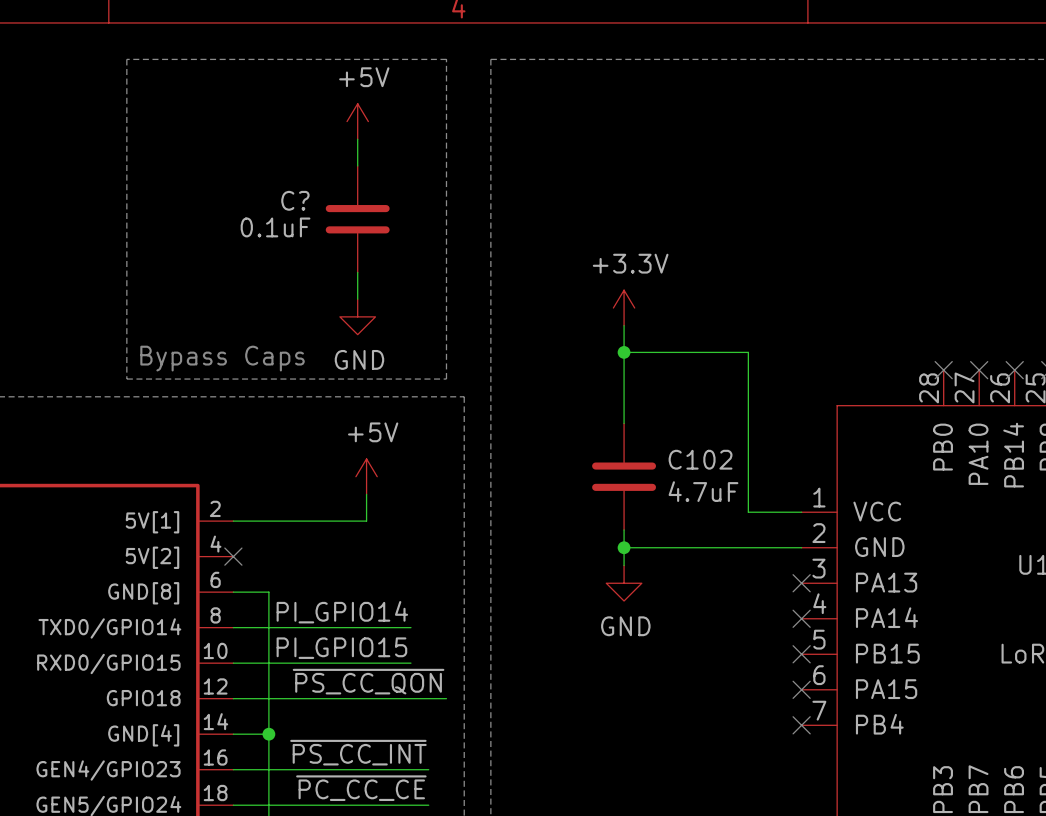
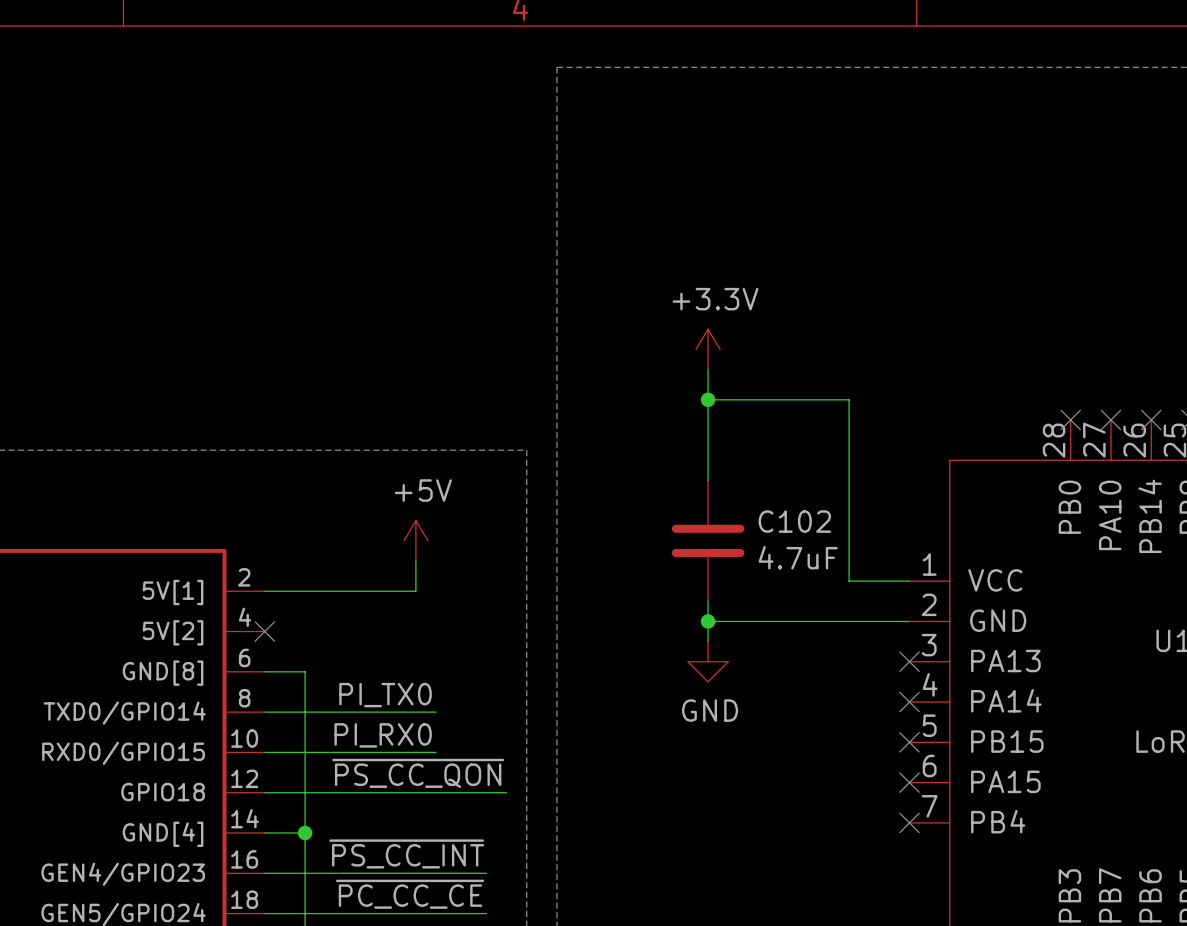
line: (126, 59) (446, 59) (446, 379) (126, 379) (126, 59) -> none
power symbol: +5V (357, 121) -> none
wire: (357, 139) (357, 165) -> none
C?: 0.1uF (357, 219) -> none
wire: (357, 272) (357, 299) -> none
power symbol: GND (357, 316) -> none
text: Bypass Caps (222, 358) -> none
label: none -> PI_TX0 (385, 695)
label: PI_GPIO14 (342, 612) -> none
wire: (384, 627) (410, 627) -> none
label: none -> PI_RX0 (383, 735)
label: PI_GPIO15 (341, 648) -> none
wire: (384, 663) (410, 663) -> none

